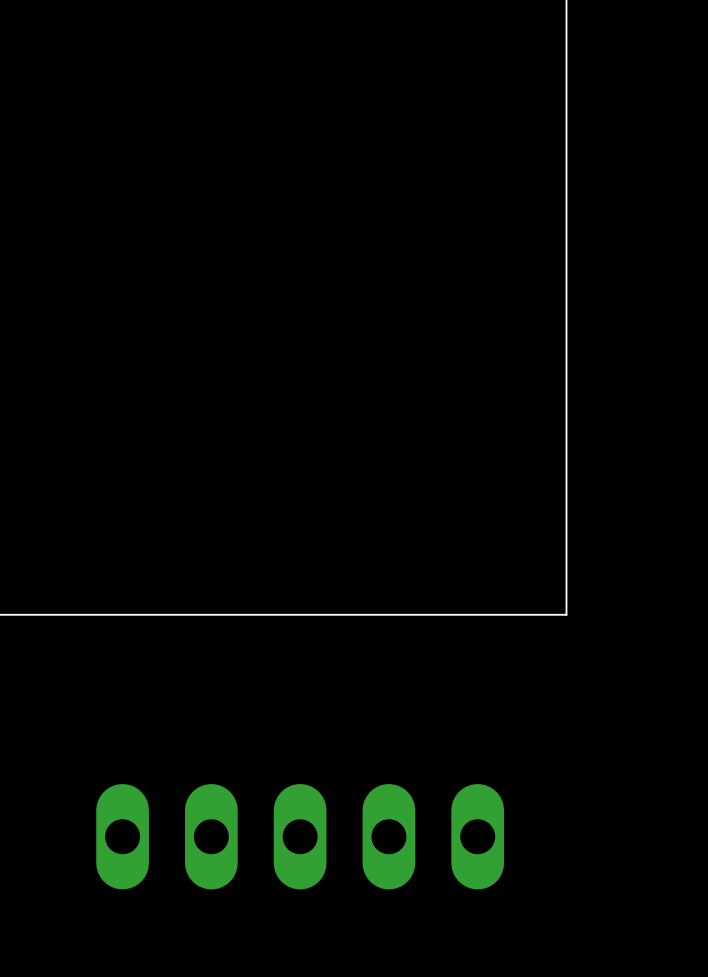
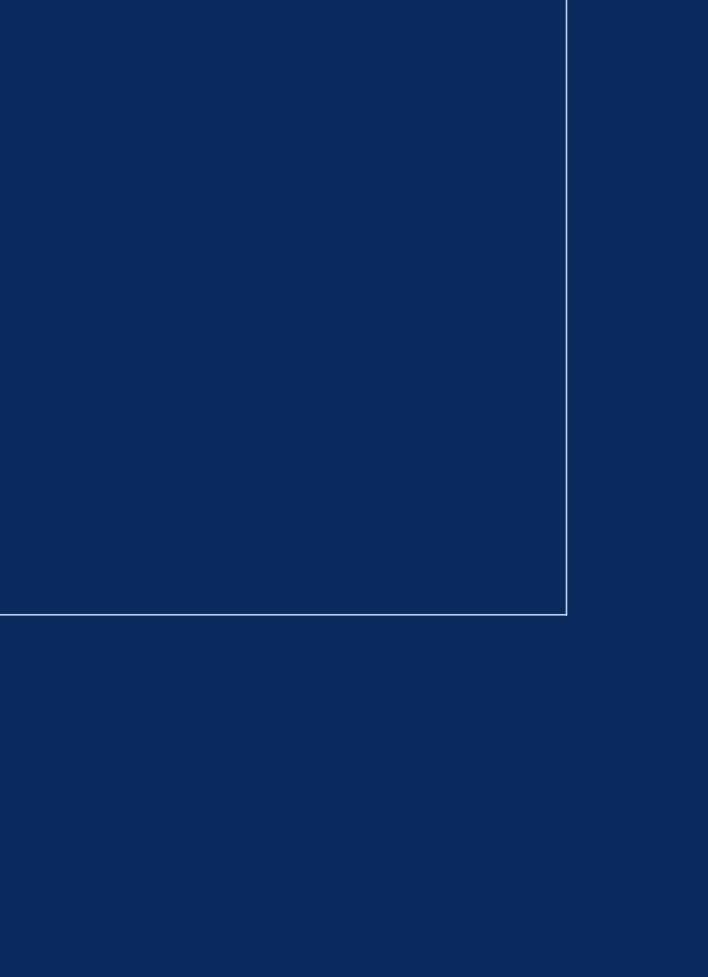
part: (300, 836) -> none

